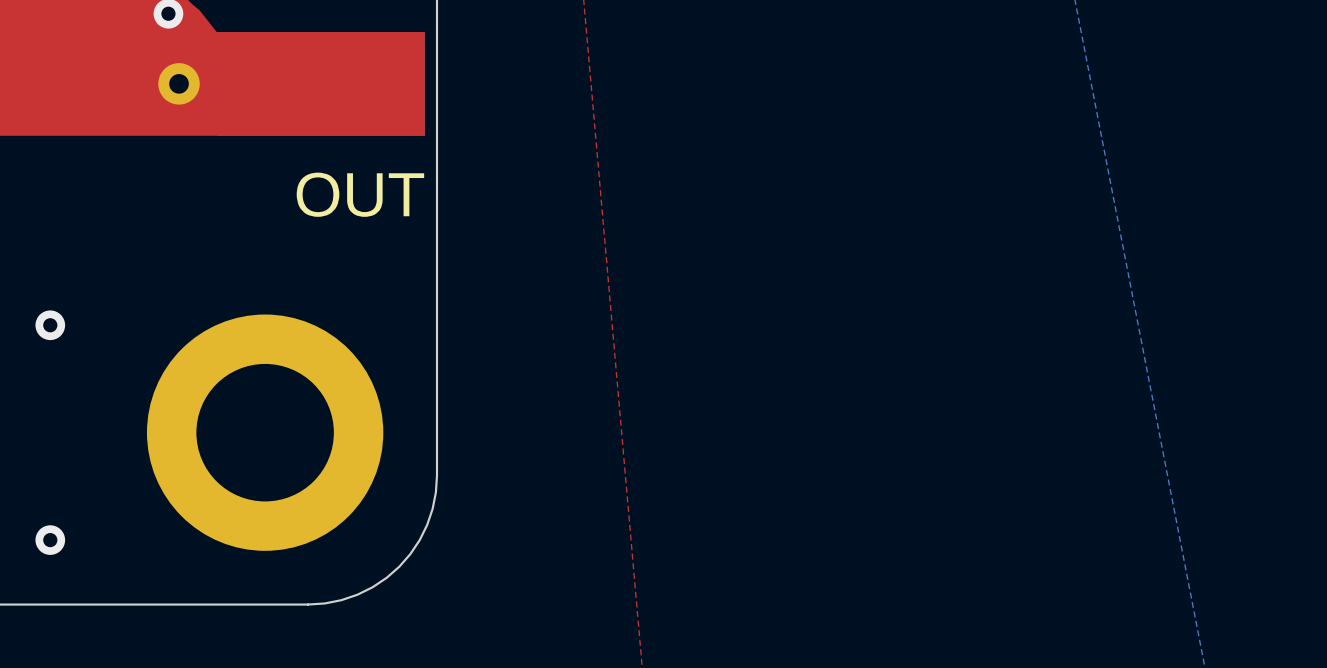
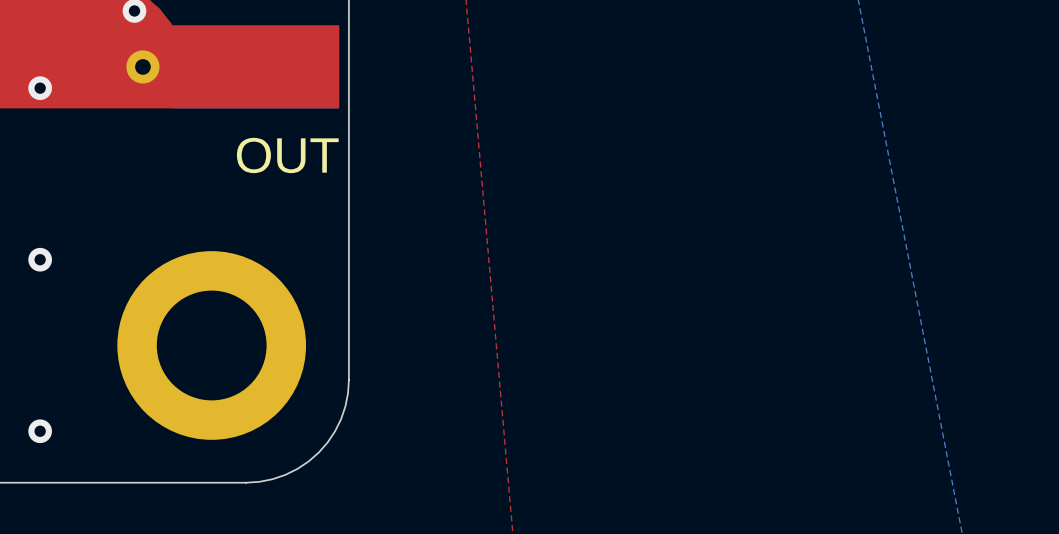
via: none -> (40, 88)

